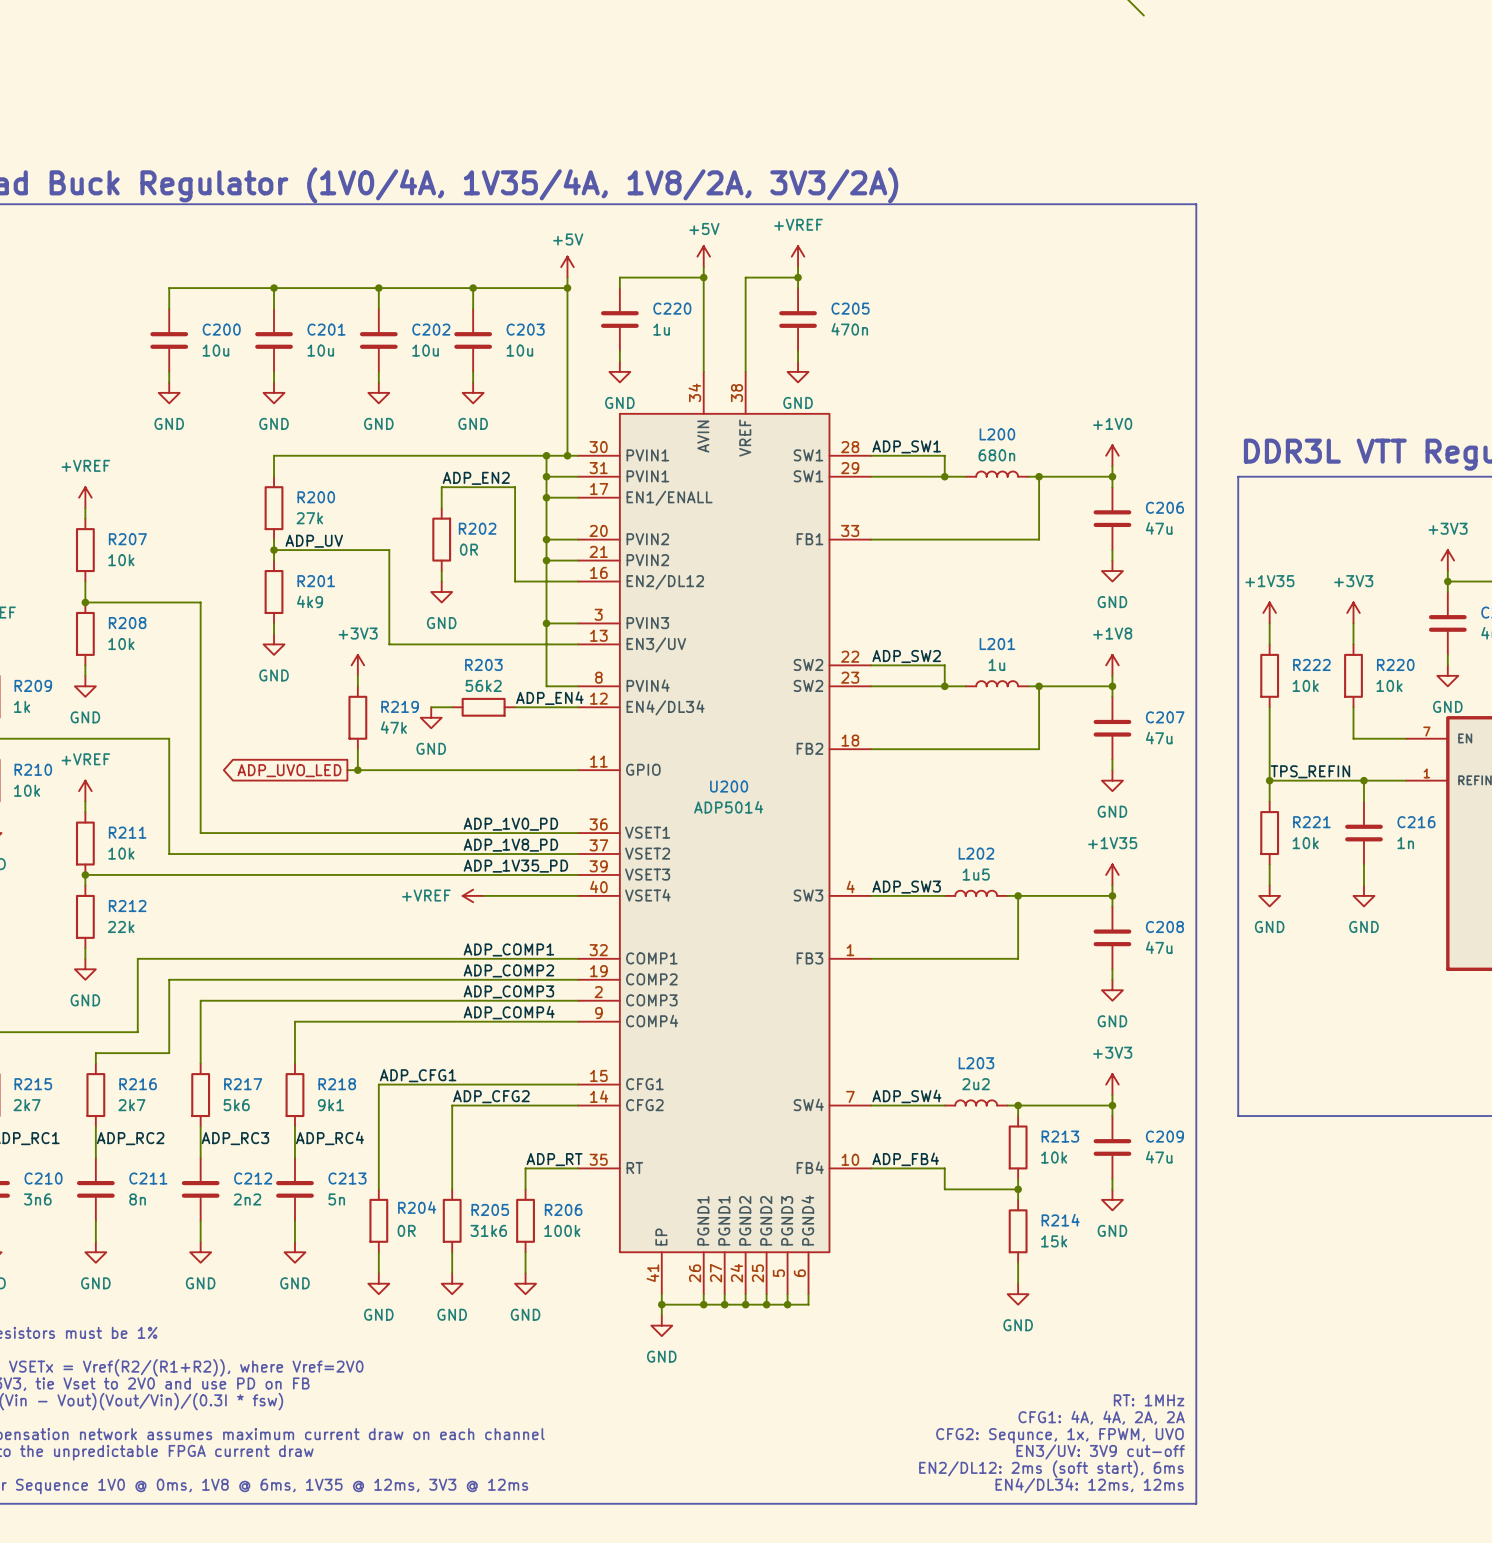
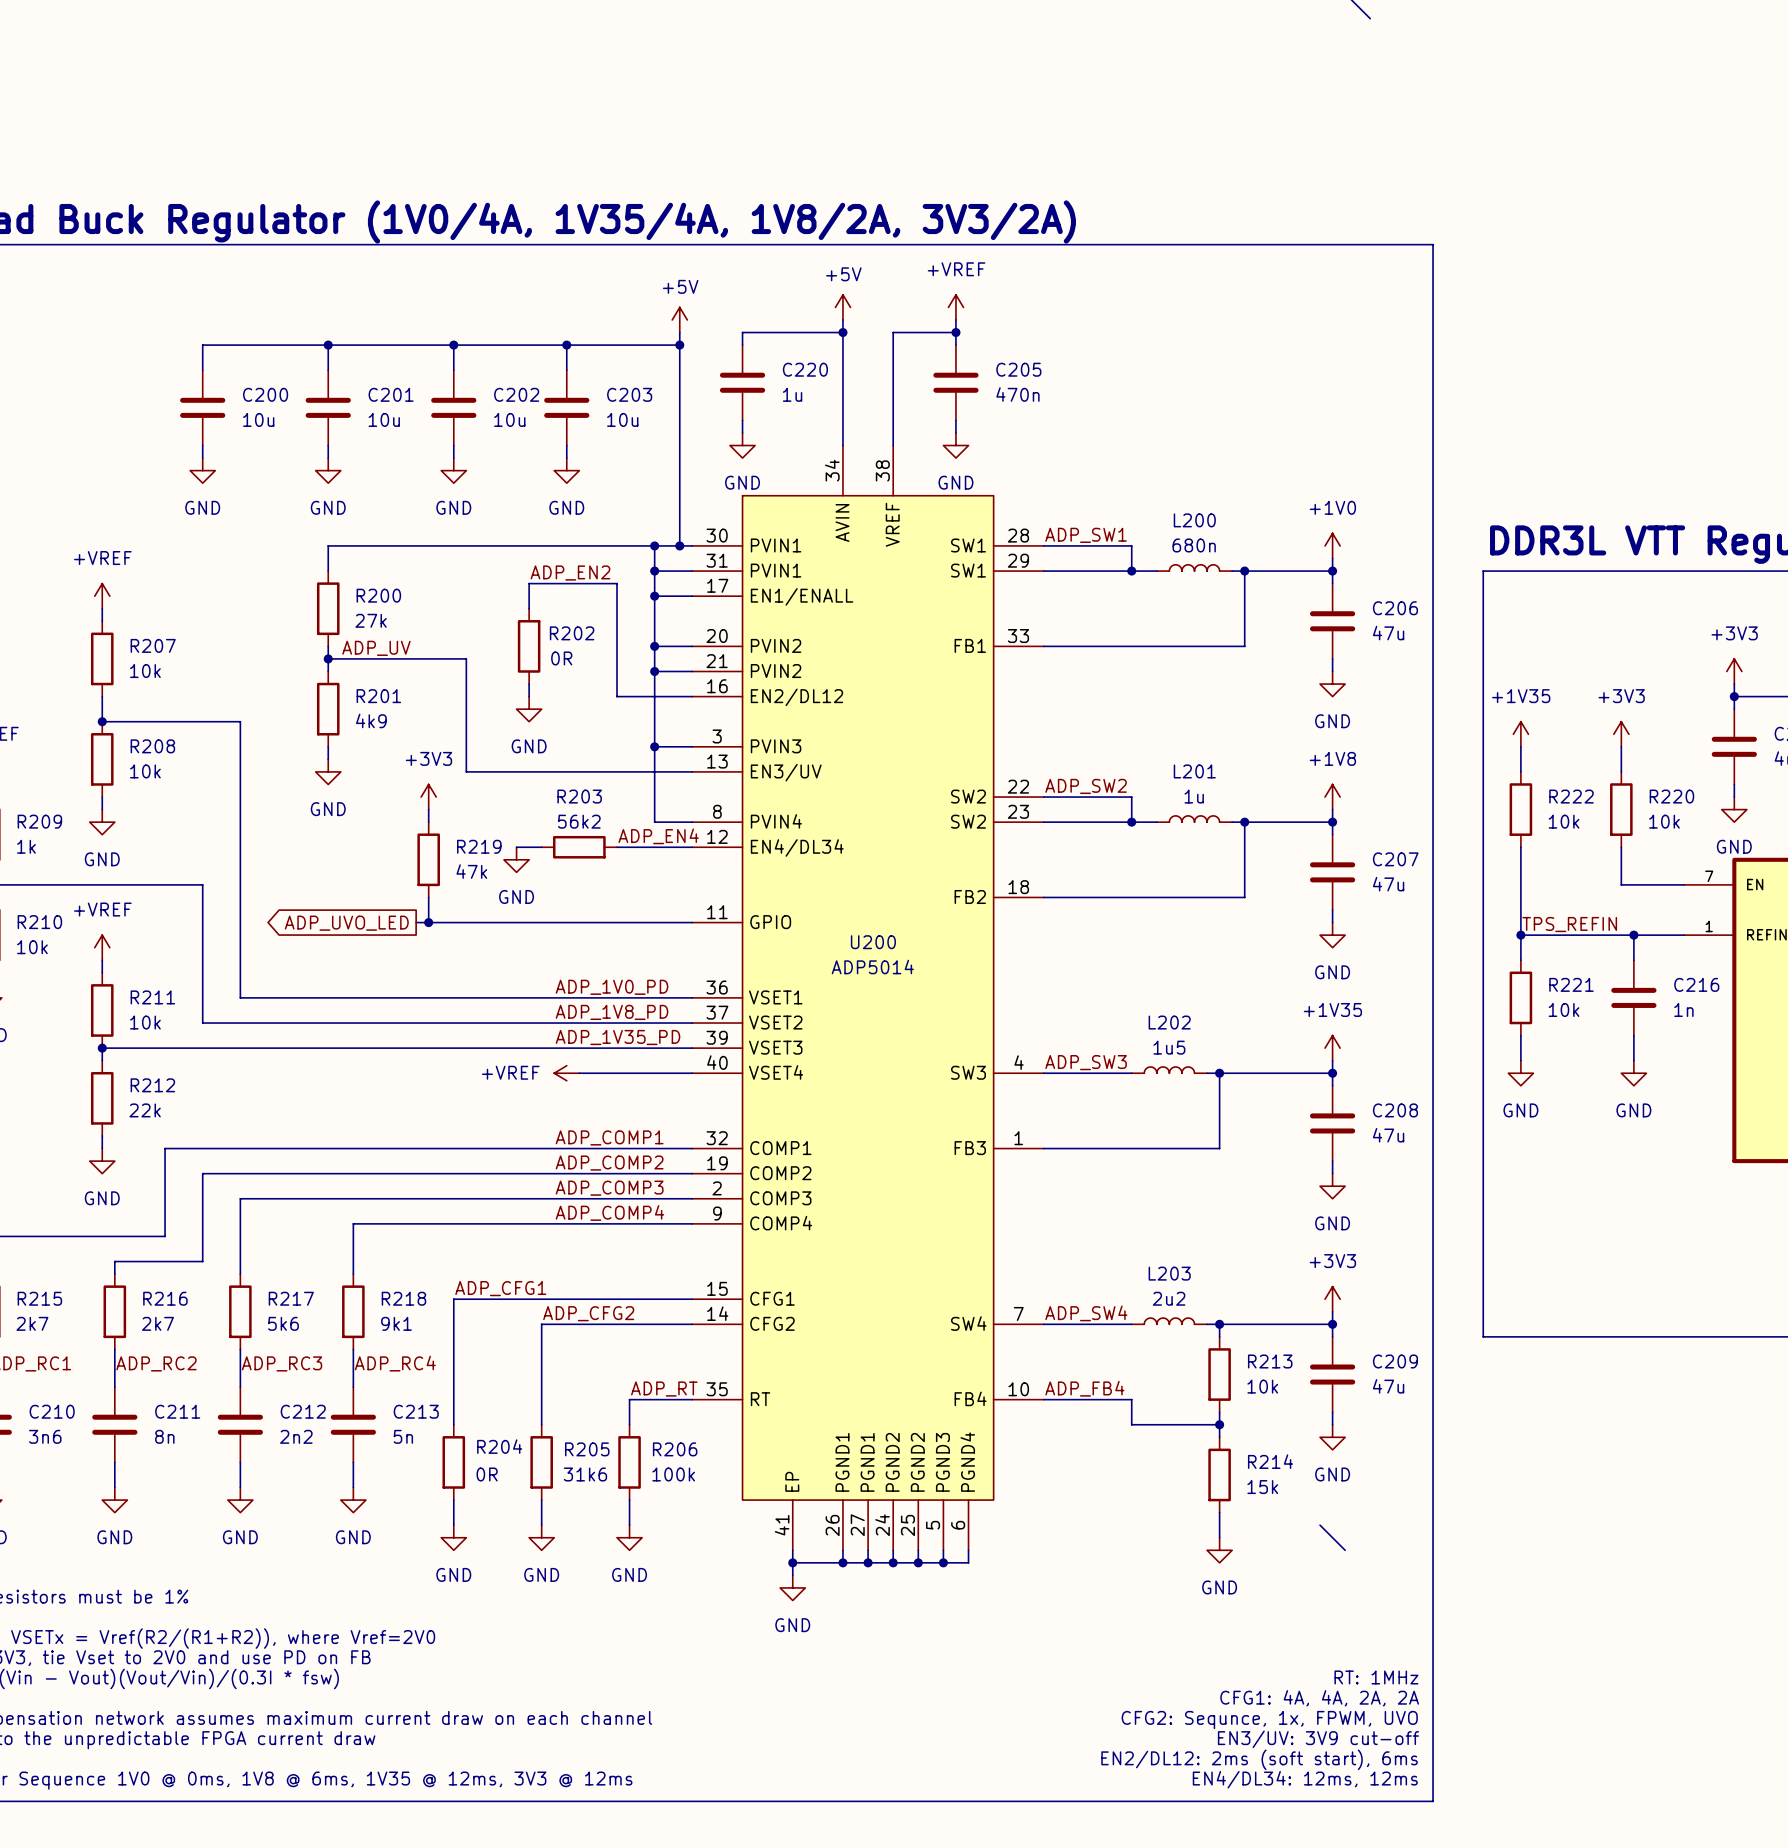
wire: none -> (1320, 1525) (1345, 1550)

